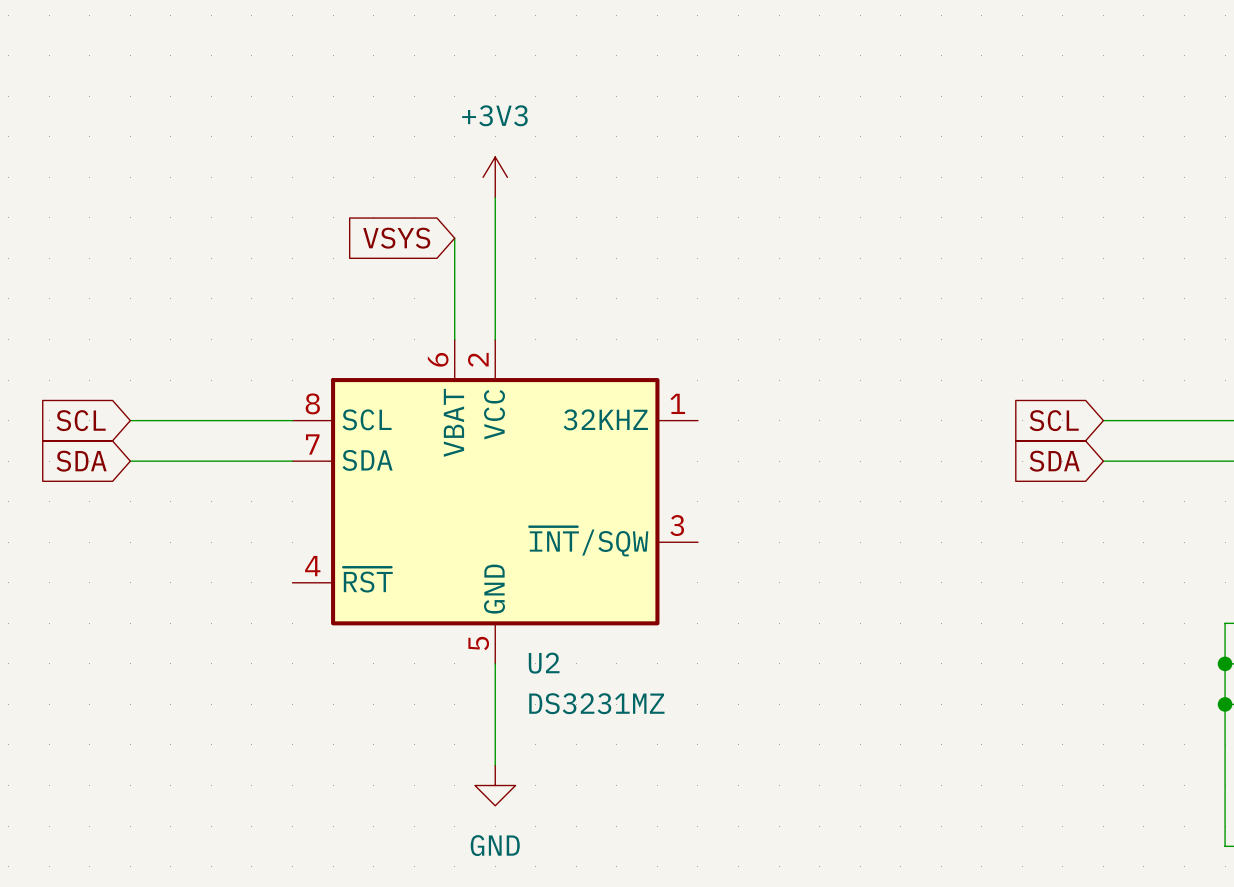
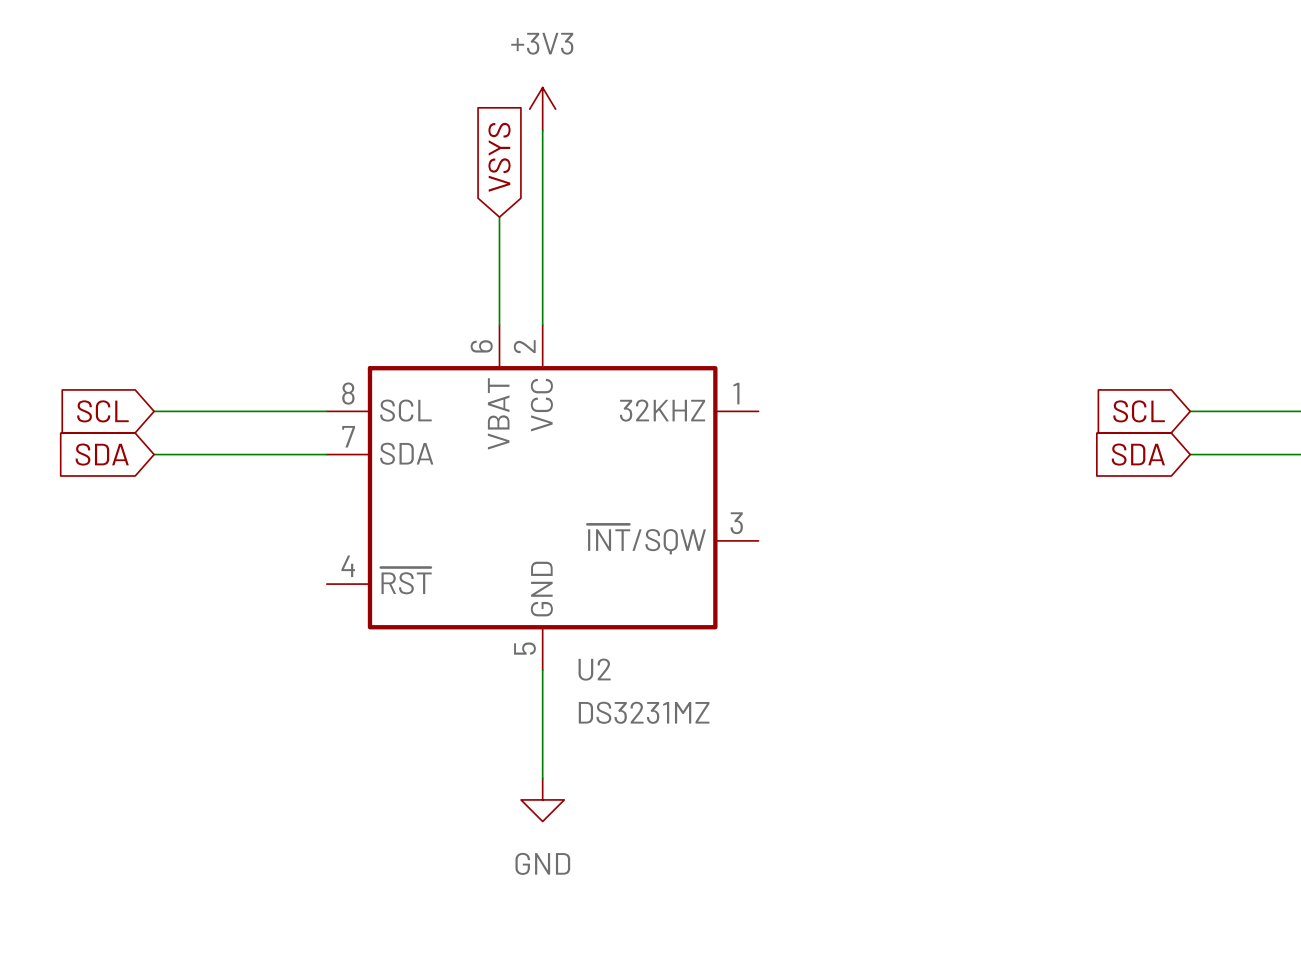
power symbol position: +3V3 (495, 177) -> +3V3 (542, 109)
global label rotation: 0° (396, 238) -> 90° clockwise (499, 157)

